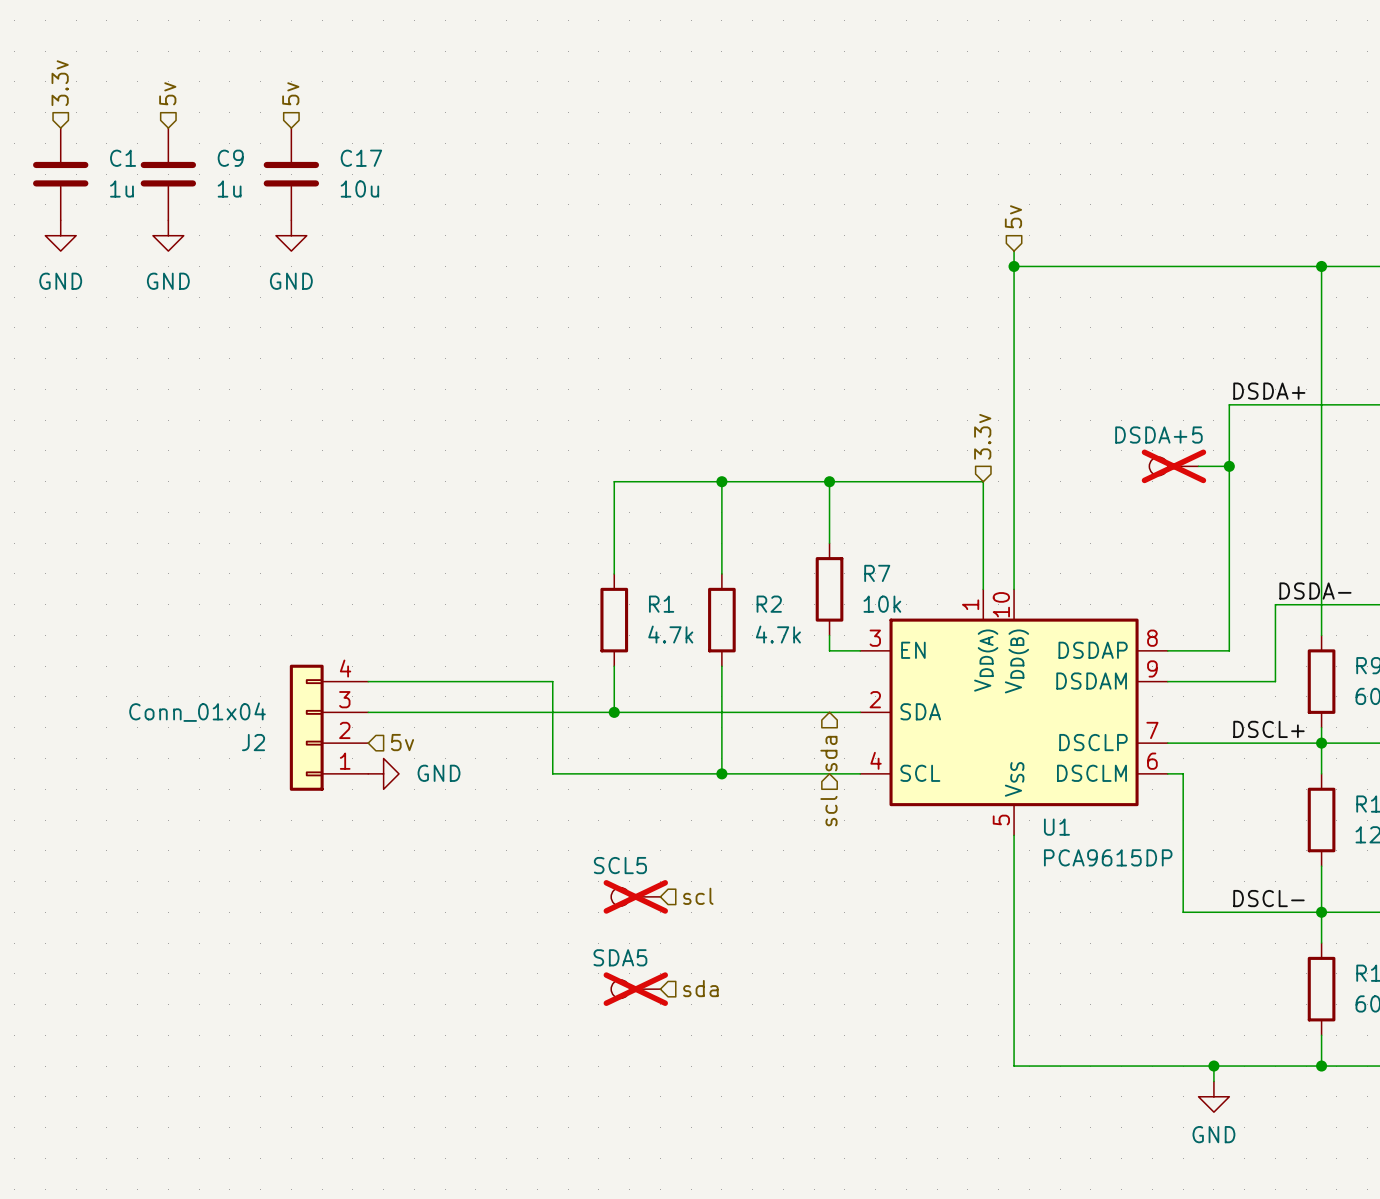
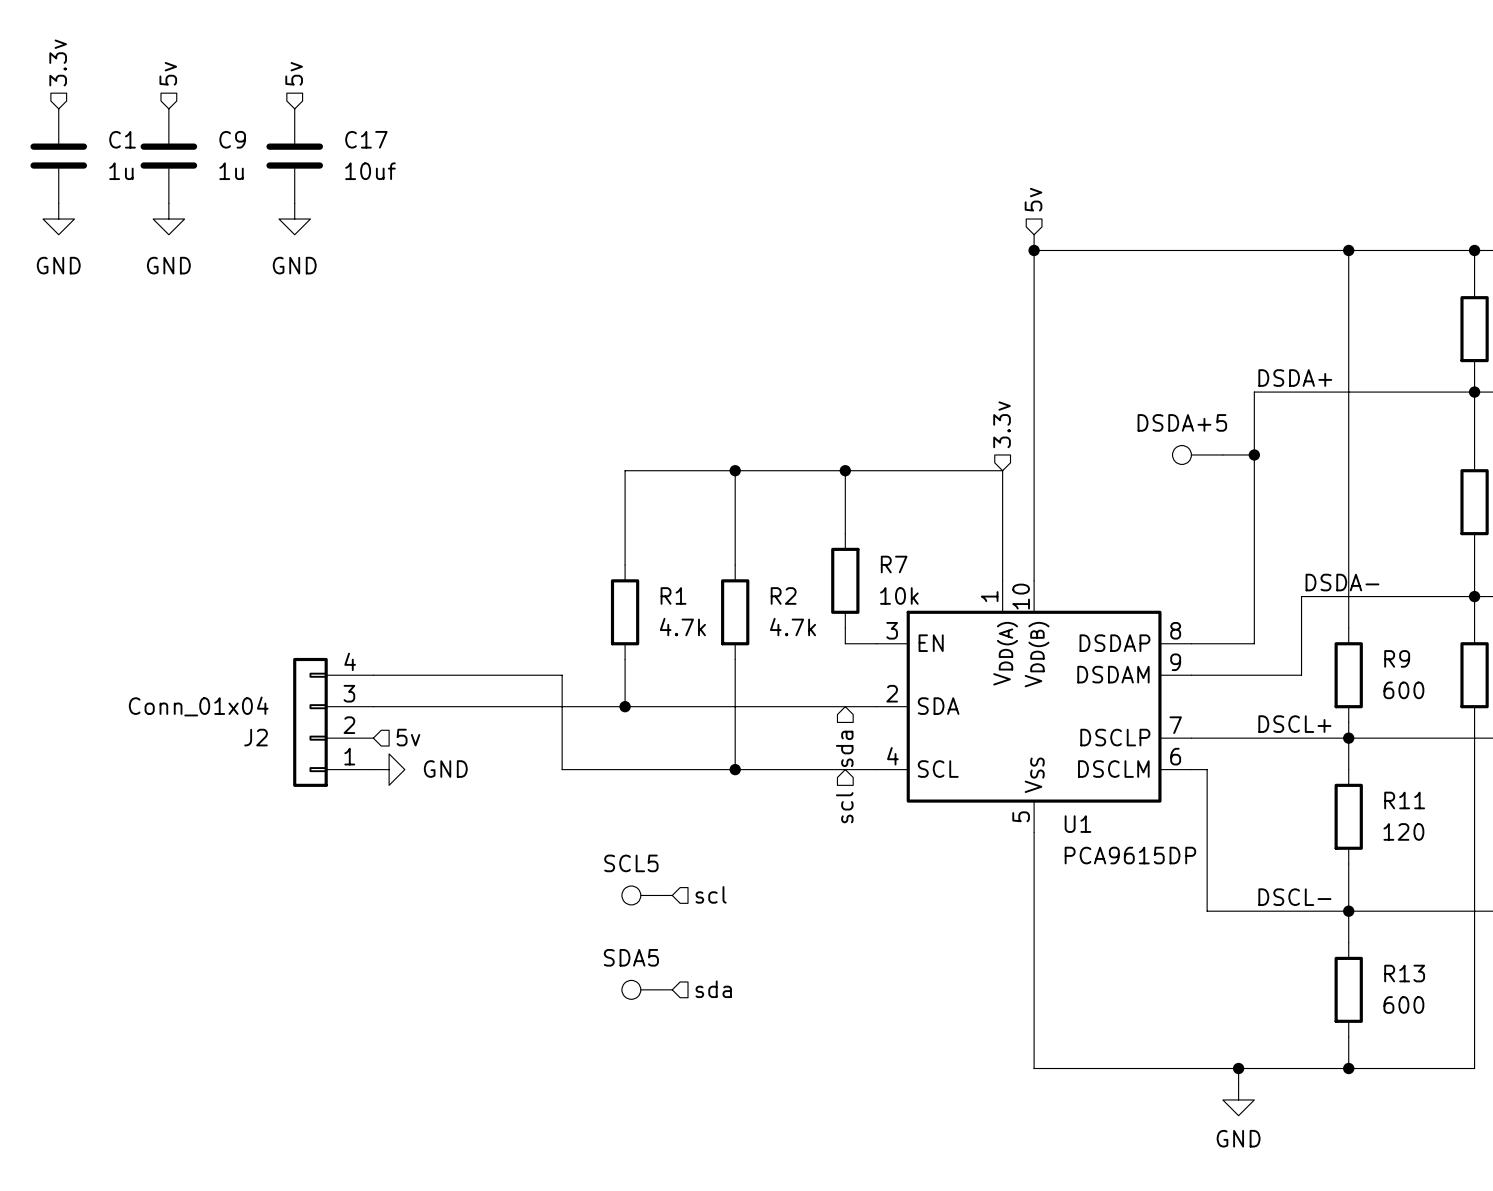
C17 value: 10u (359, 189) -> 10uf (370, 171)
DSDA+5 do-not-place cross: (1173, 466) -> none
SCL5 do-not-place cross: (635, 896) -> none
SDA5 do-not-place cross: (635, 989) -> none

